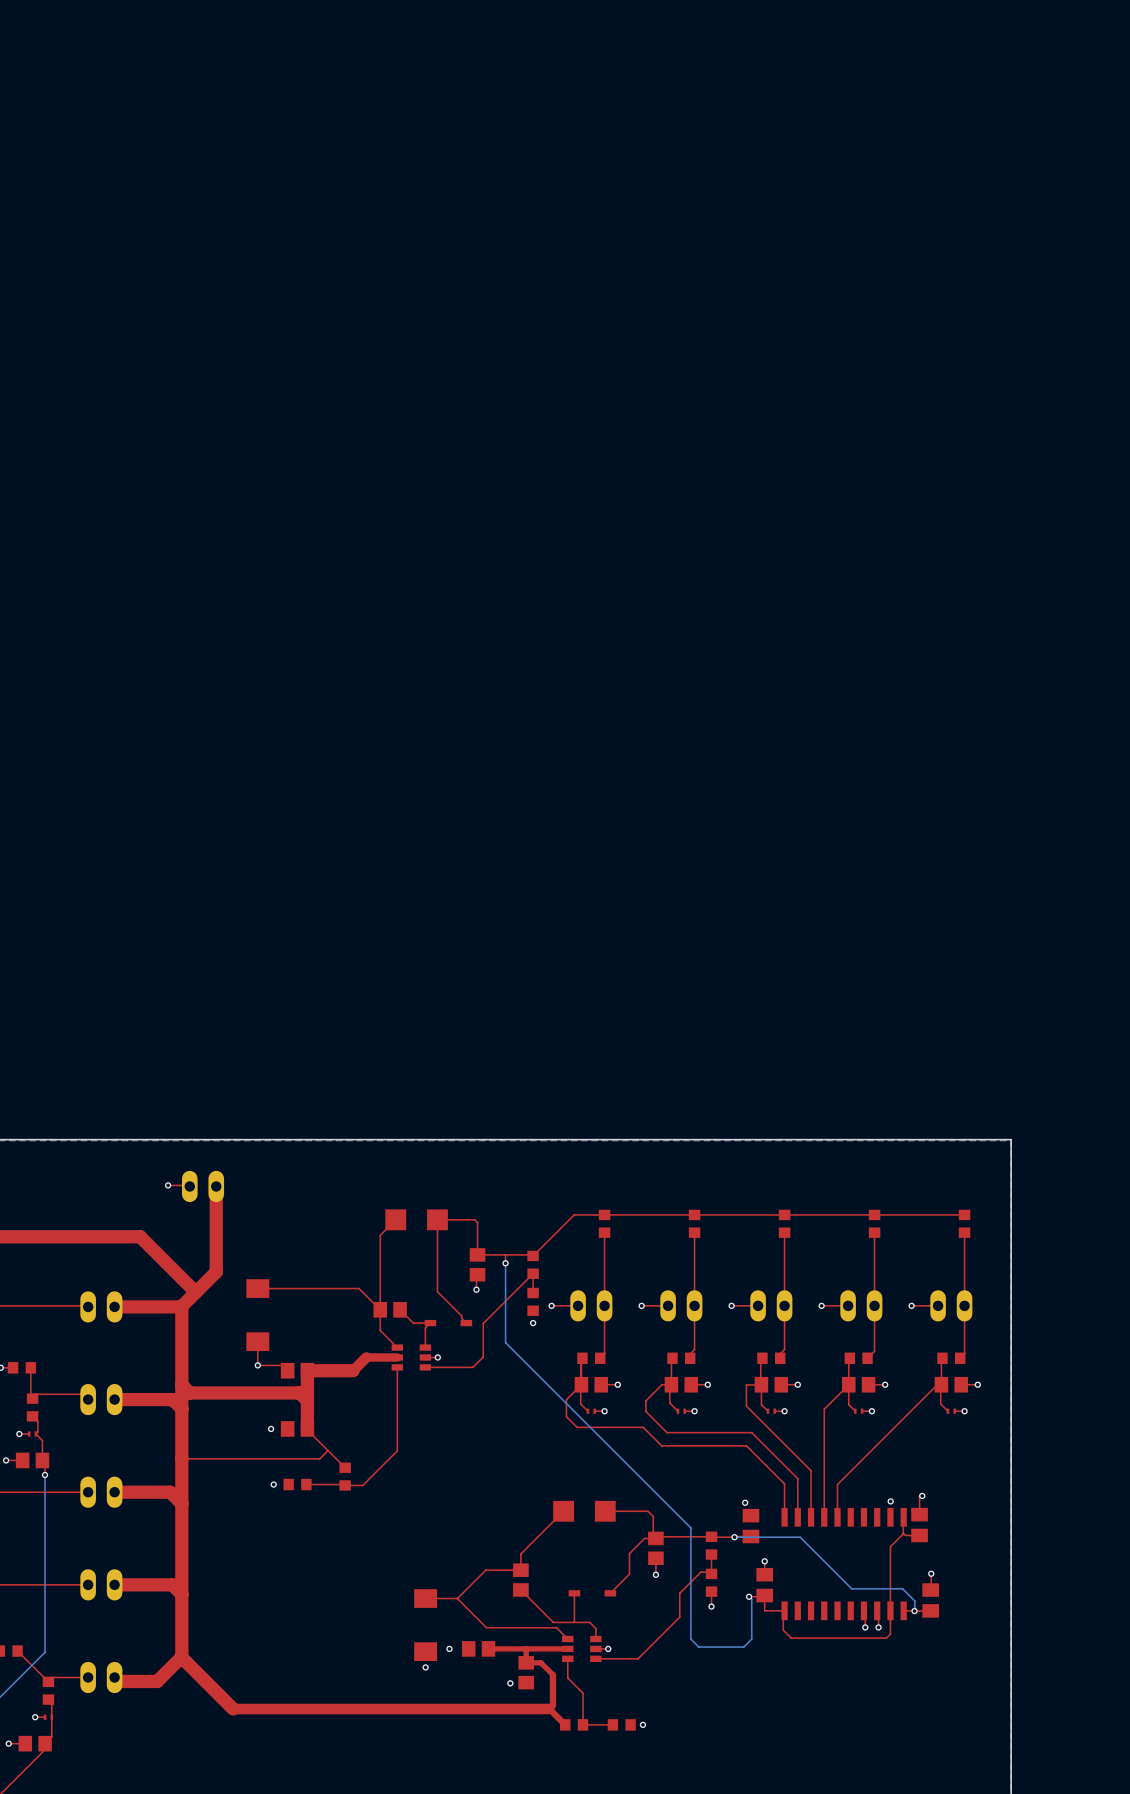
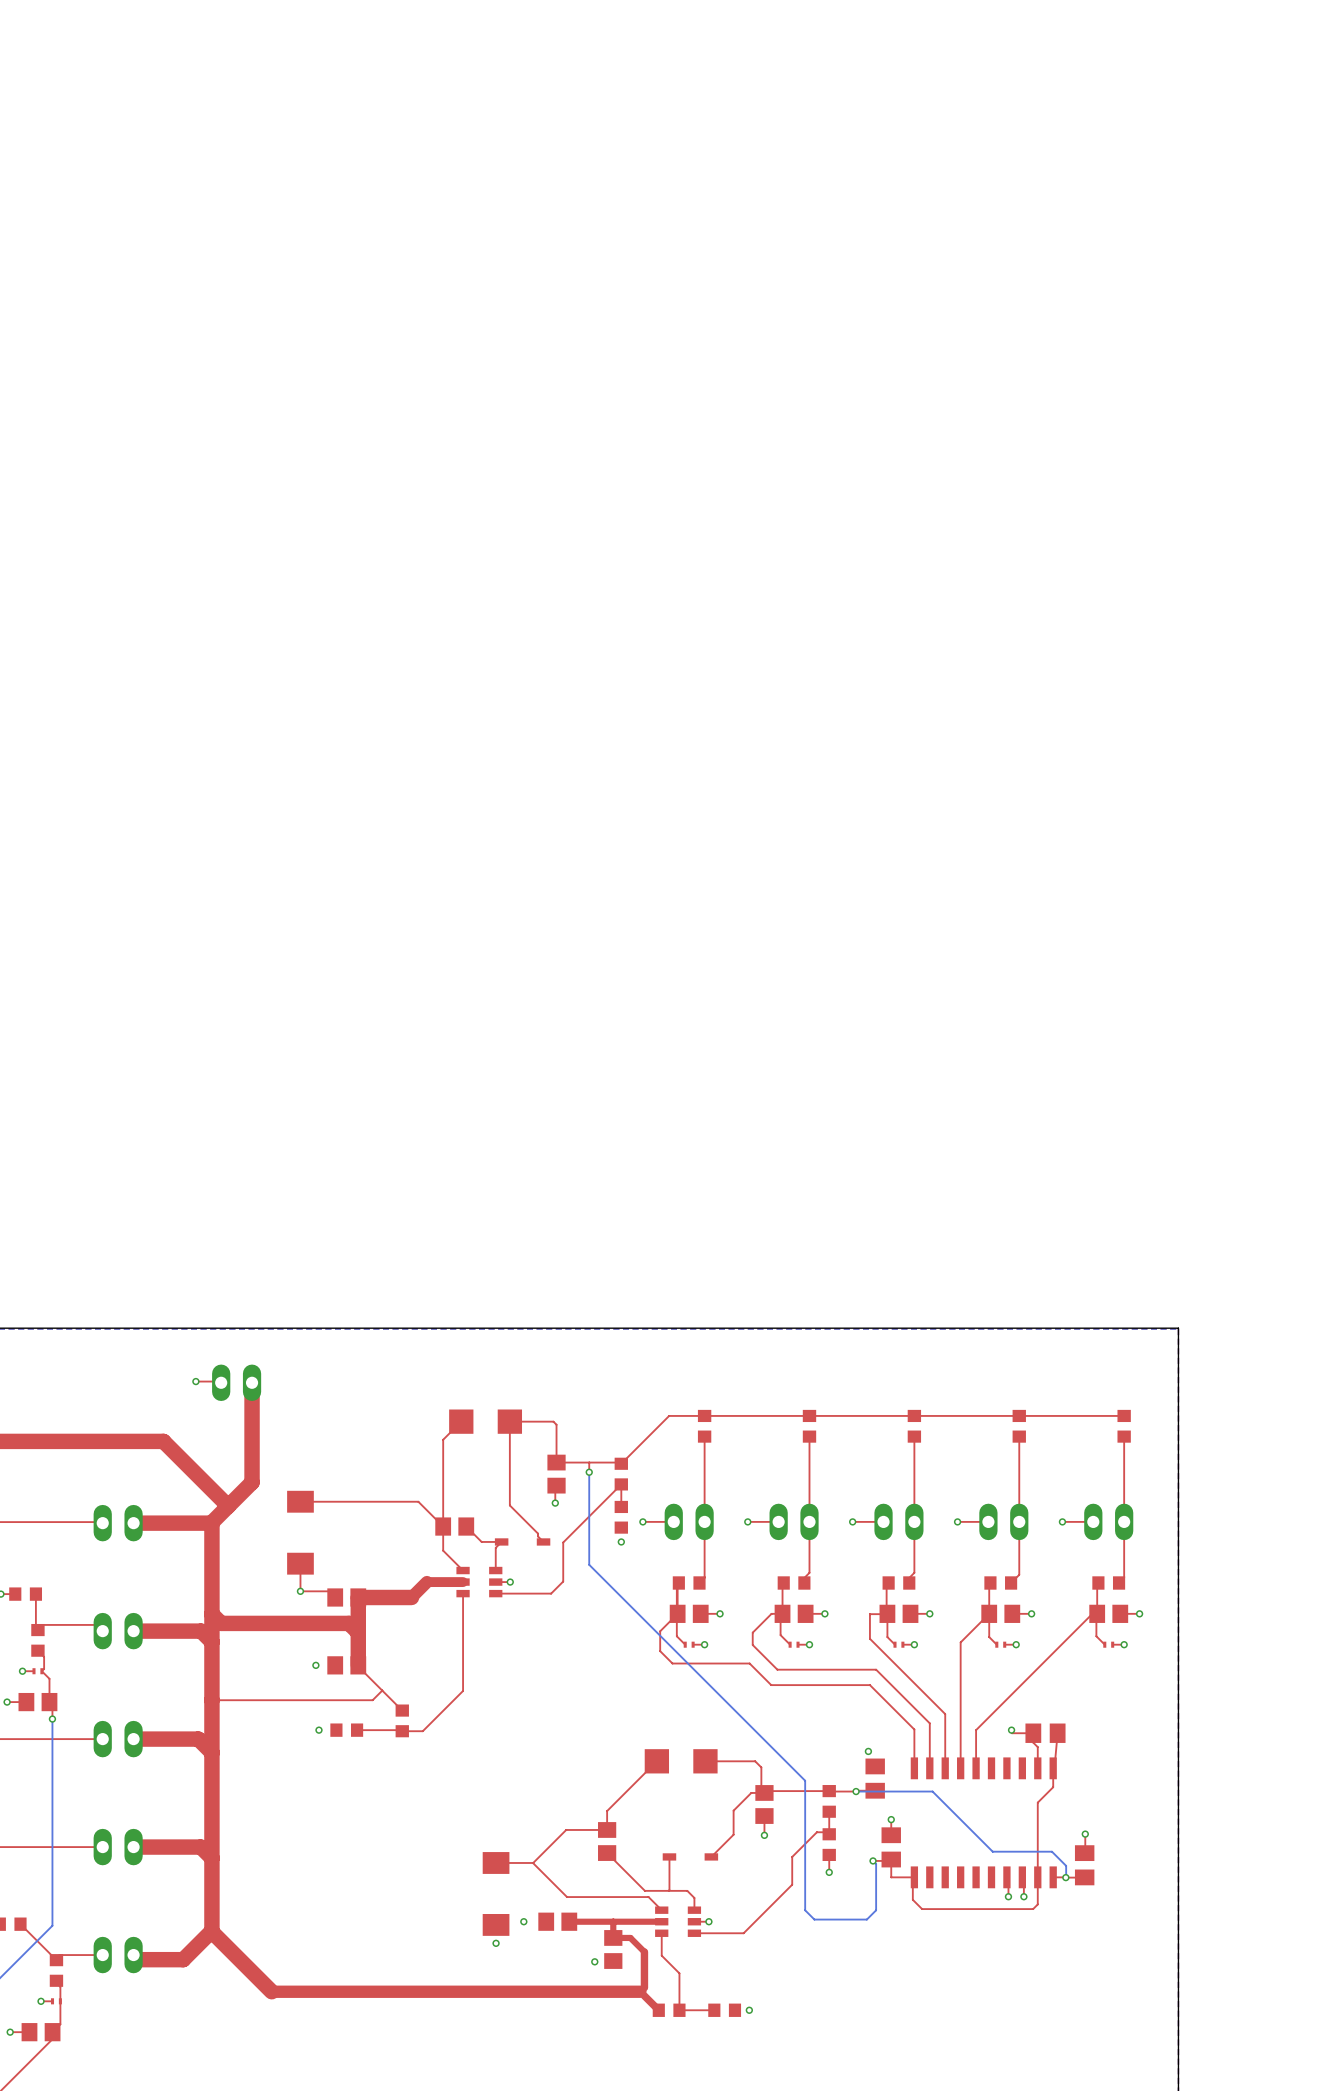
top track: none -> (1011, 1730) (1011, 1733) (1033, 1733)
via: none -> (1011, 1730)
top track: none -> (1033, 1733) (1033, 1742) (1037, 1747) (1037, 1768)
top track: (922, 1495) (919, 1496) (919, 1514) -> none
via: (922, 1495) -> none
via: (890, 1501) -> none
top track: (903, 1517) (903, 1533) -> (1057, 1733) (1052, 1787)
part rotation: 0° (919, 1525) -> 90° clockwise (1045, 1733)
part position: (919, 1525) -> (1045, 1733)
top track: (903, 1533) (905, 1535) (919, 1535) -> none

